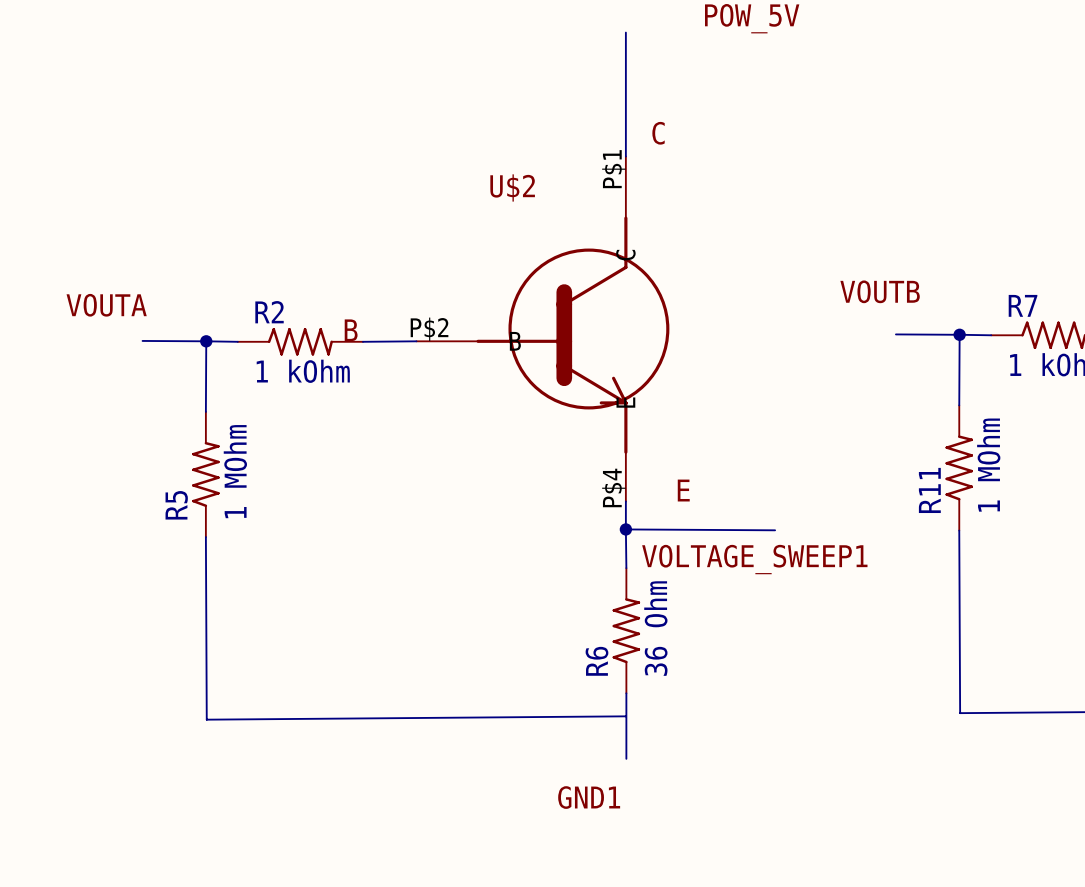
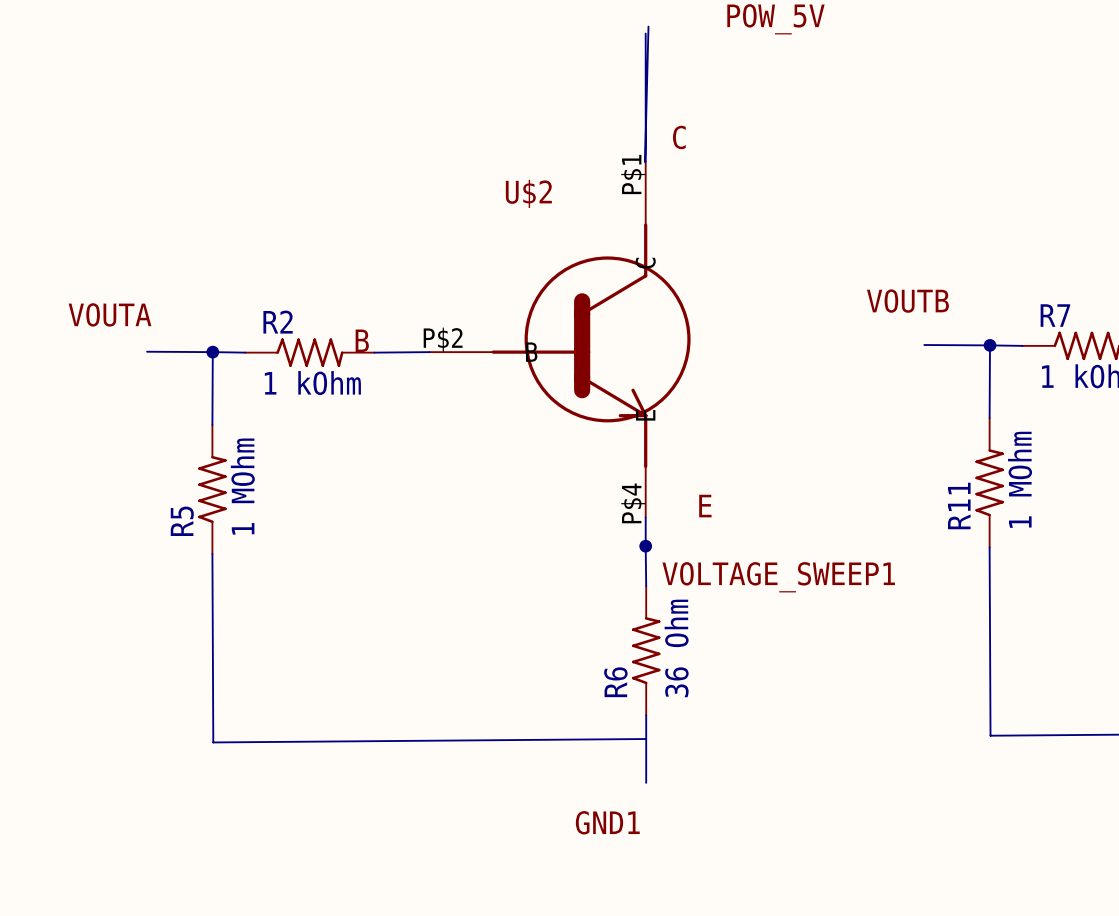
wire: none -> (648, 26) (645, 162)
wire: (625, 529) (775, 530) -> none

